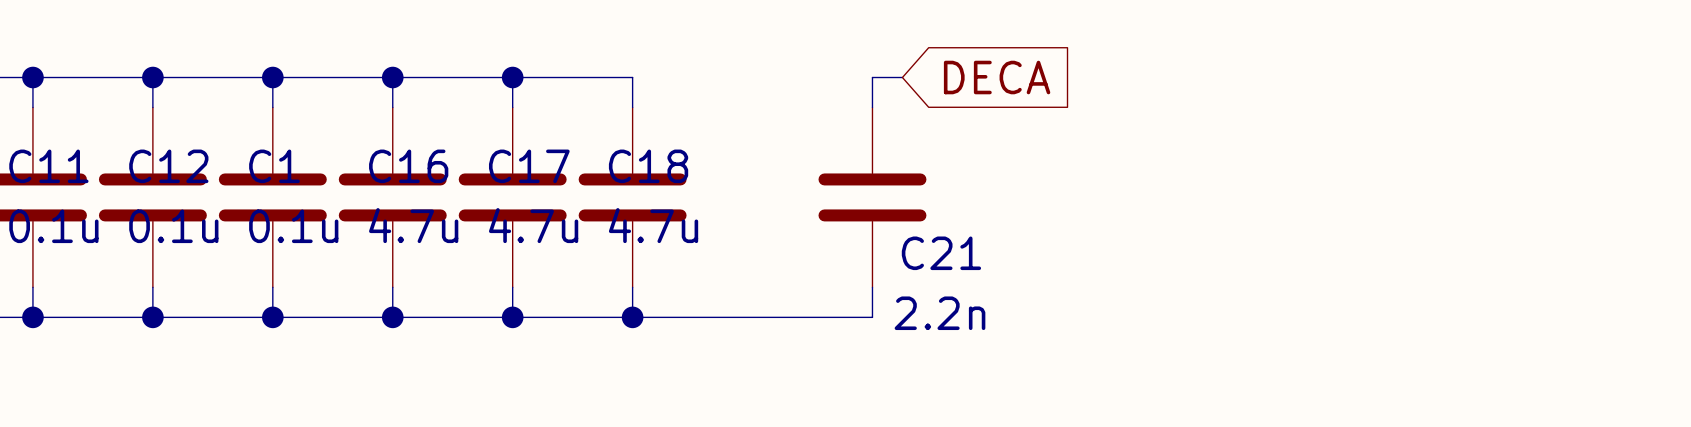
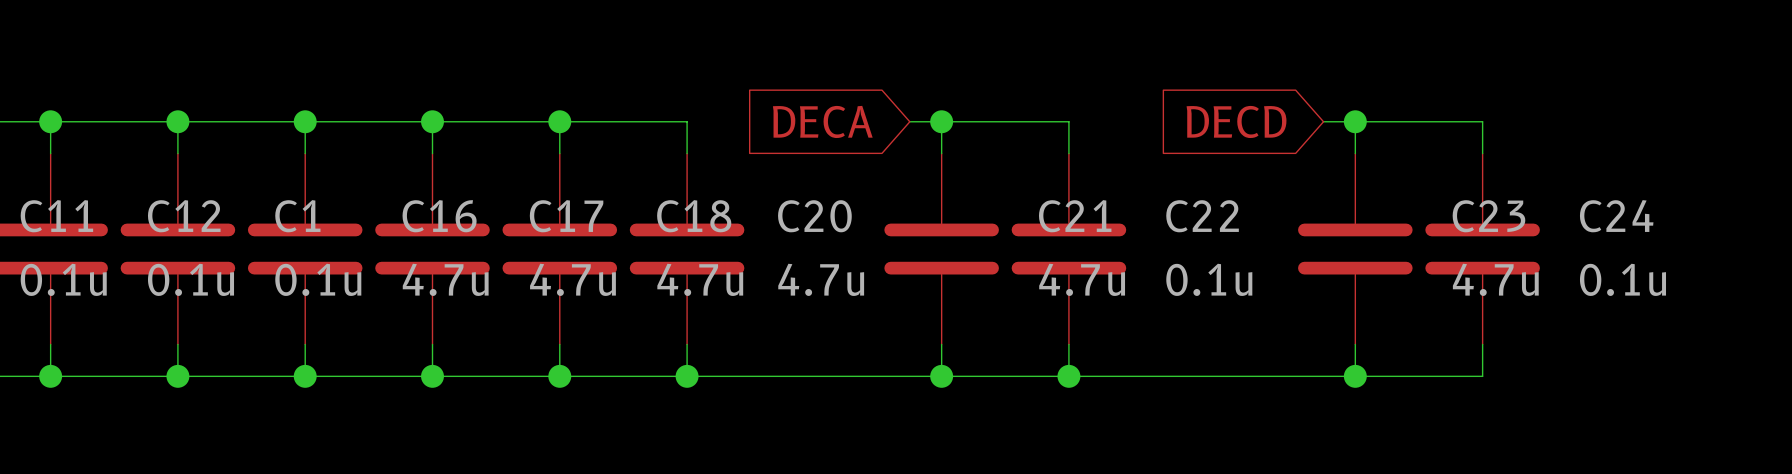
wire: none -> (909, 121) (941, 121)
junction: none -> (941, 121)
wire: none -> (973, 121) (1068, 121) (1068, 153)
global label rotation: 0° (997, 77) -> 180° (822, 121)
global label position: DECA (997, 77) -> DECA (822, 121)
global label: none -> DECD (1236, 121)
wire: none -> (1323, 121) (1482, 121) (1482, 153)
wire: none -> (1355, 121) (1355, 153)
junction: none -> (1355, 121)
C20 name: none -> C20 (814, 216)
C22: none -> 0.1u (1068, 249)
C23: none -> 4.7u (1355, 249)
C24: none -> 0.1u (1482, 249)
C20 value: none -> 4.7u (821, 279)
C21 name position: C21 (941, 253) -> C21 (1075, 216)
wire: none -> (1068, 344) (1068, 376)
wire: none -> (1355, 344) (1355, 376)
wire: none -> (1482, 344) (1482, 376) (941, 376)
C21 value: 2.2n (940, 313) -> 4.7u (1082, 279)
junction: none -> (941, 376)
junction: none -> (1068, 376)
junction: none -> (1355, 376)

